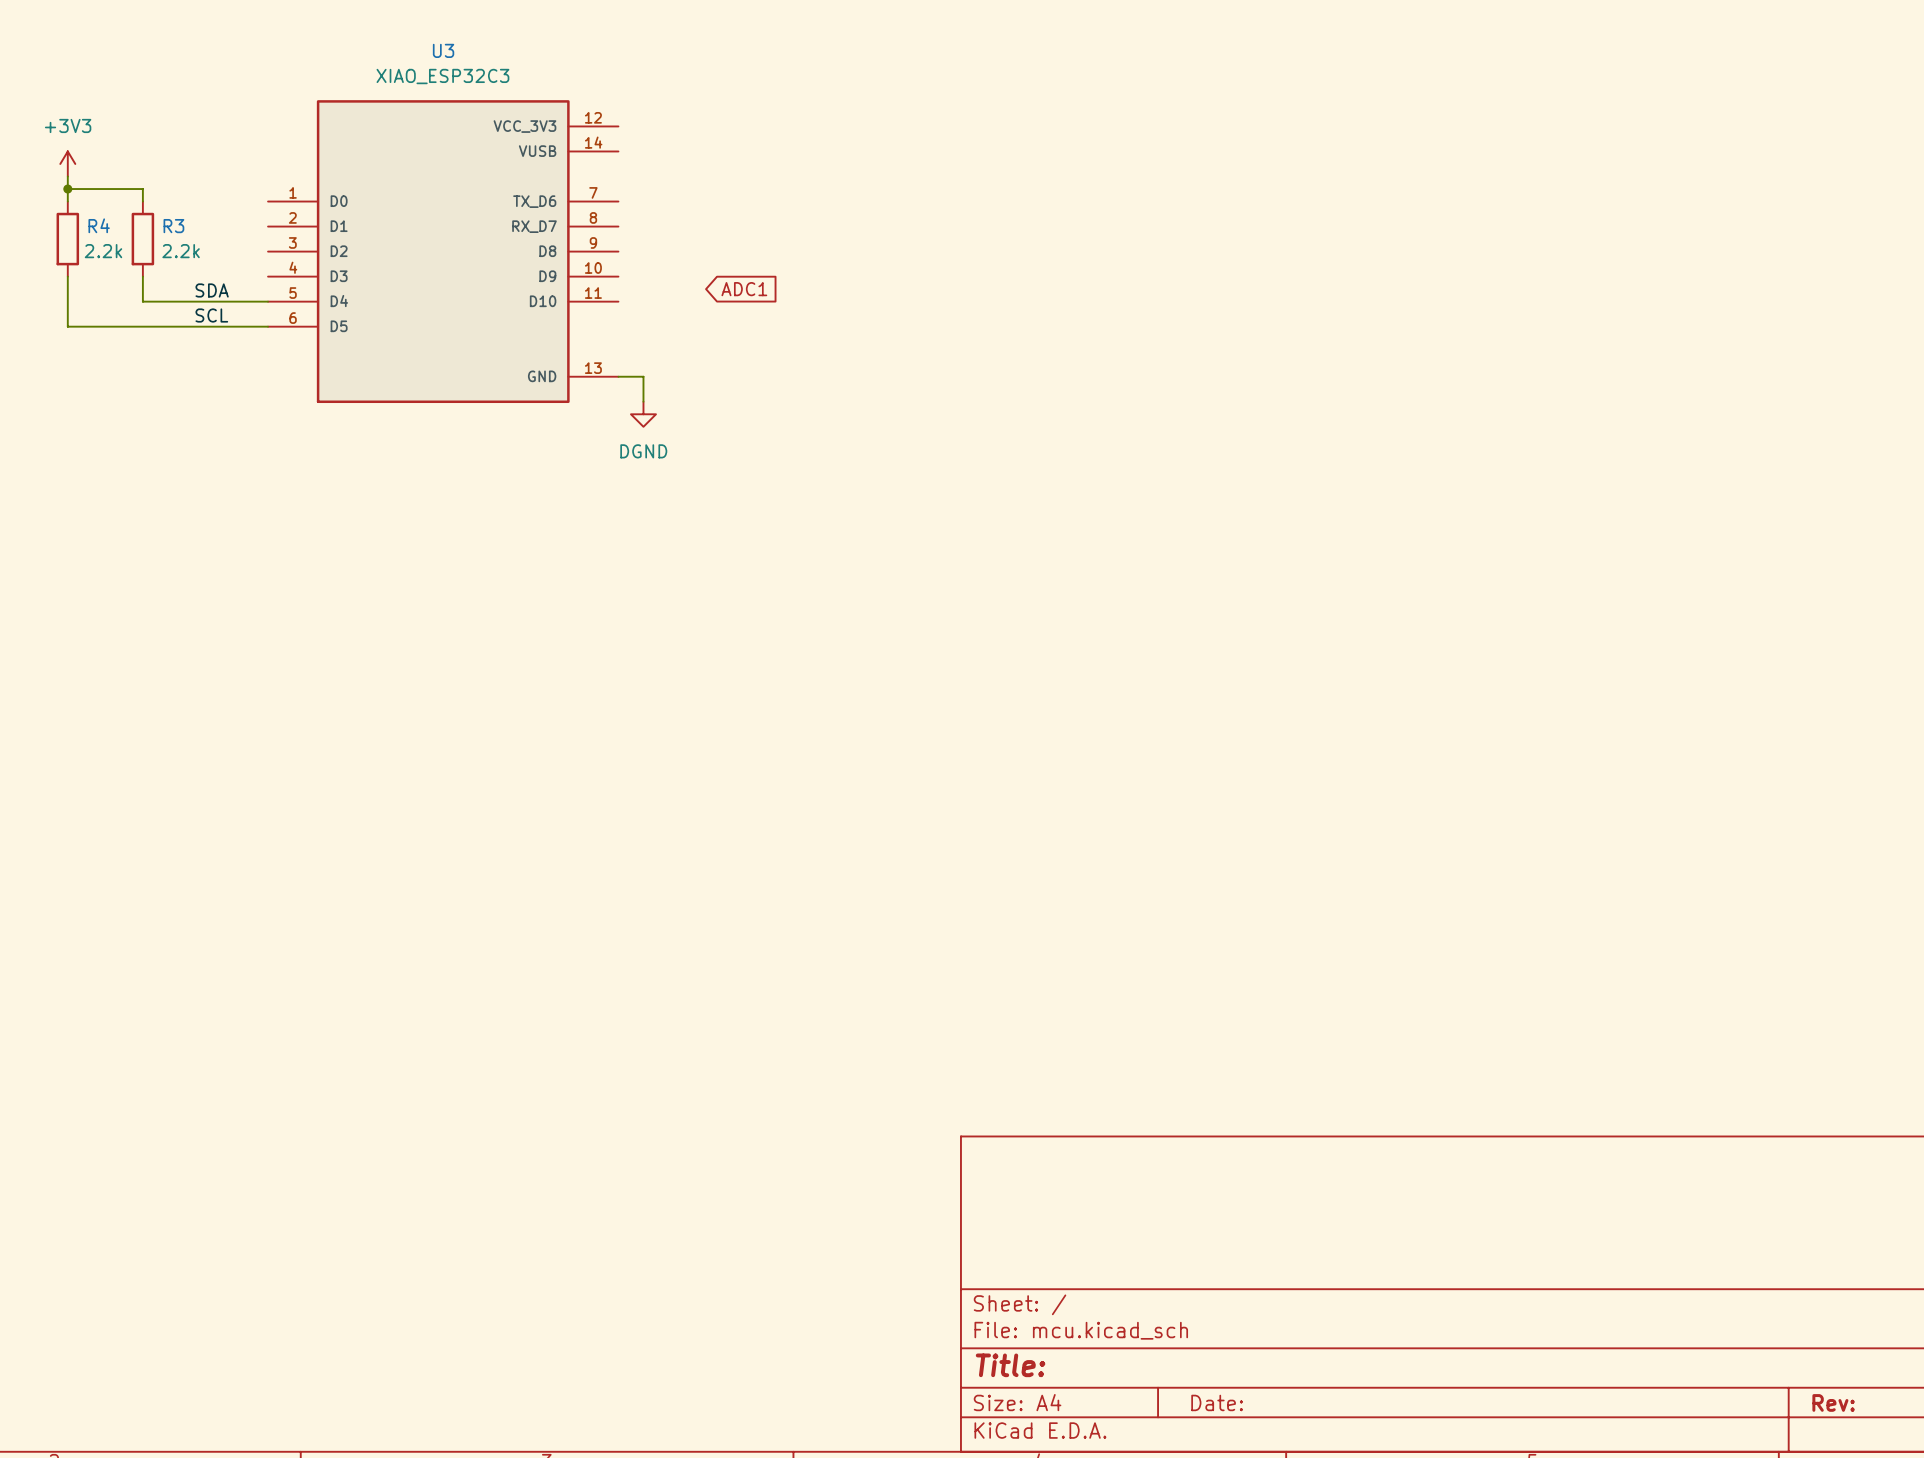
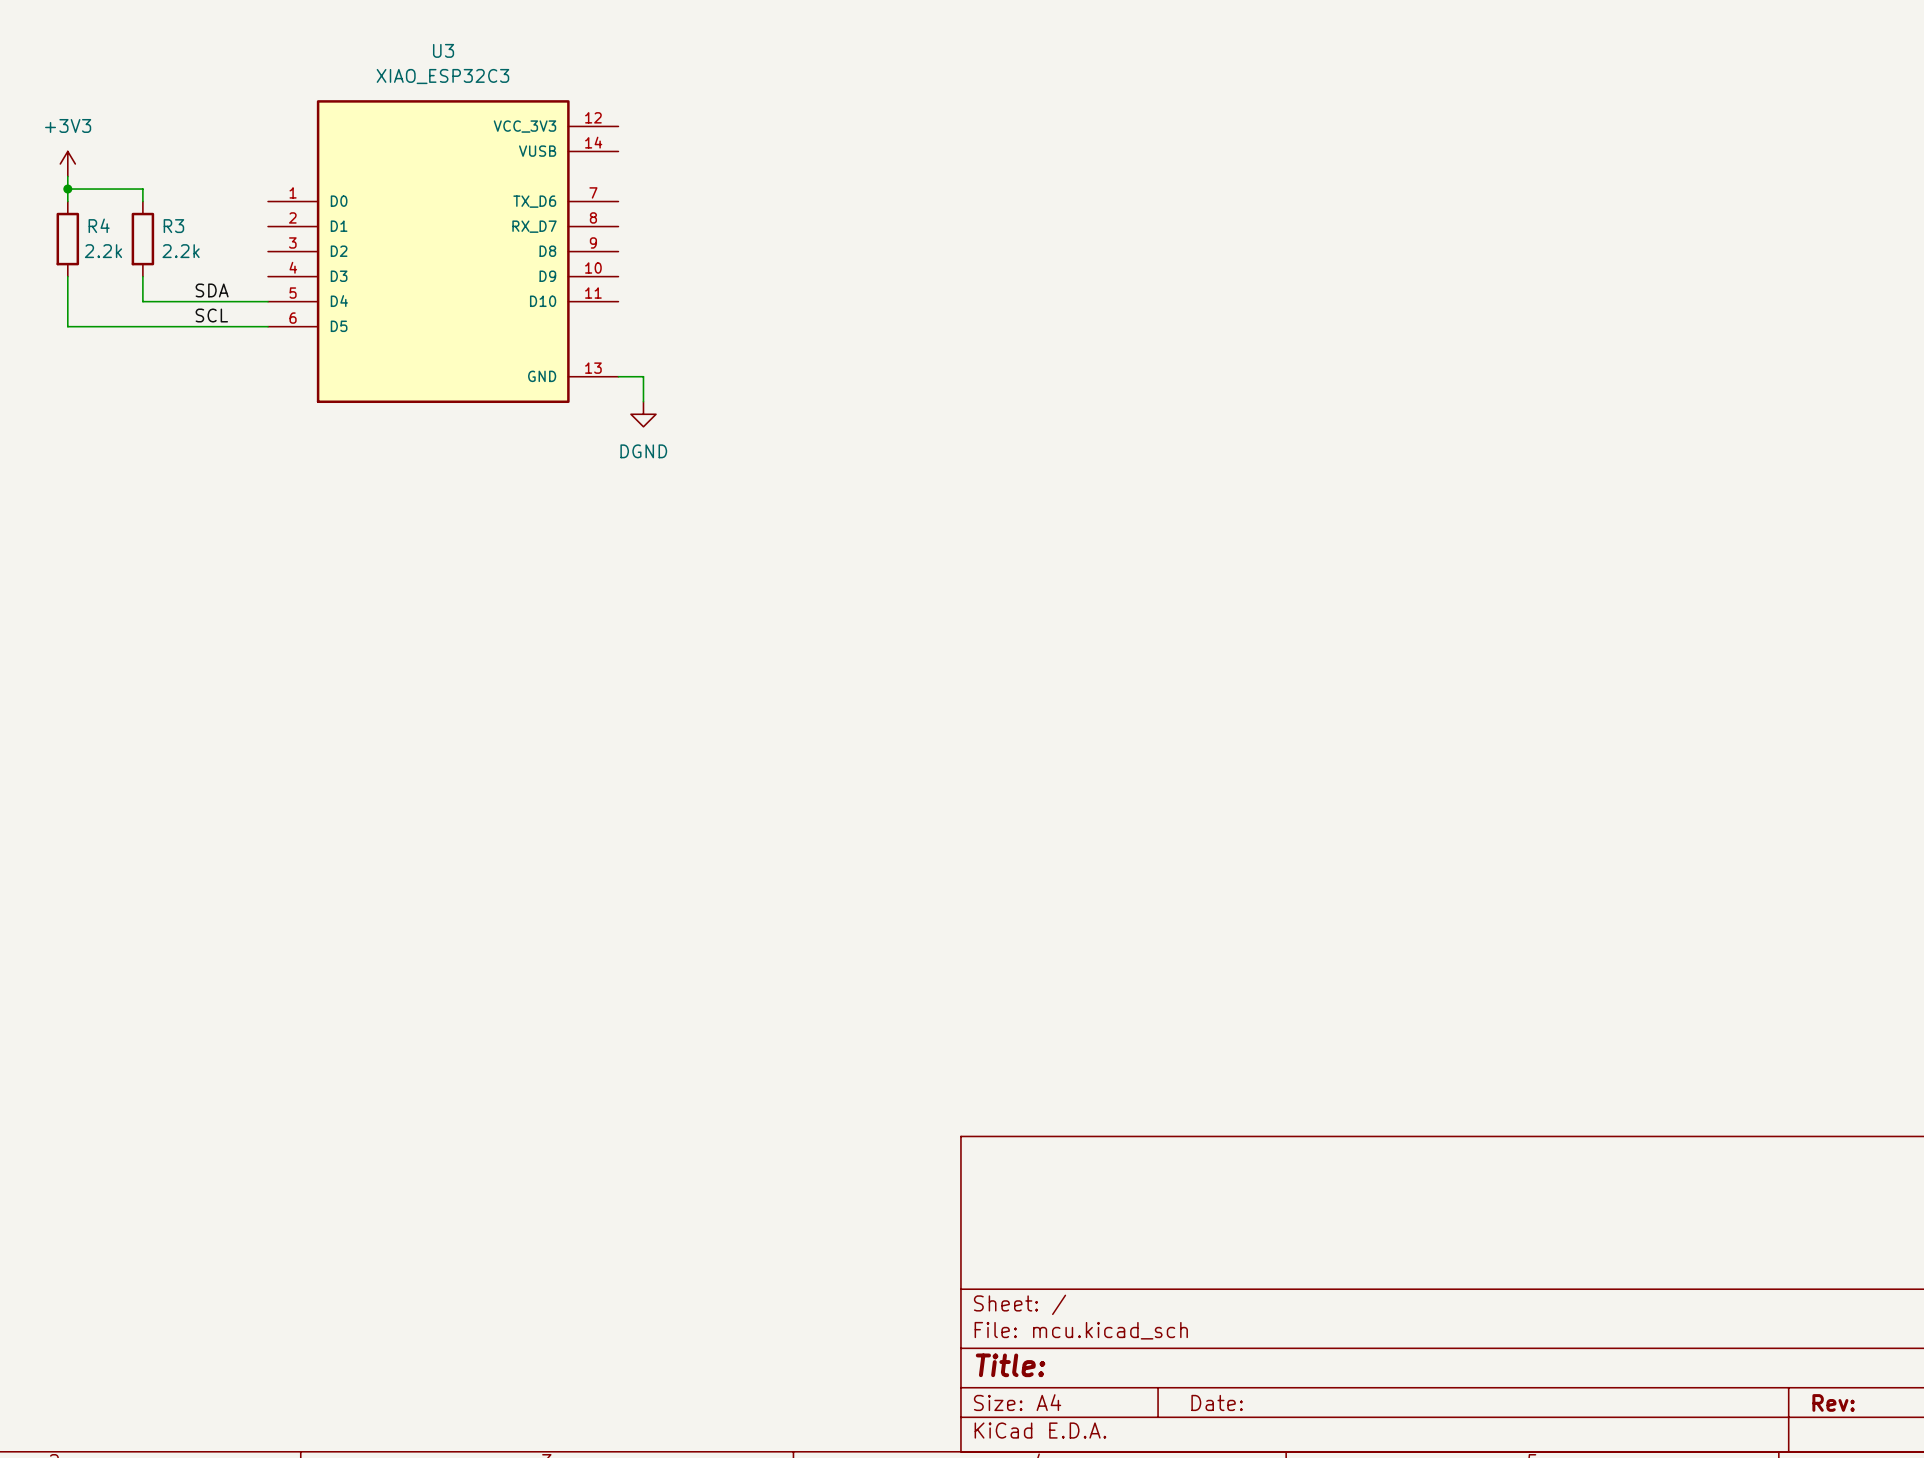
global label: ADC1 (744, 289) -> none

